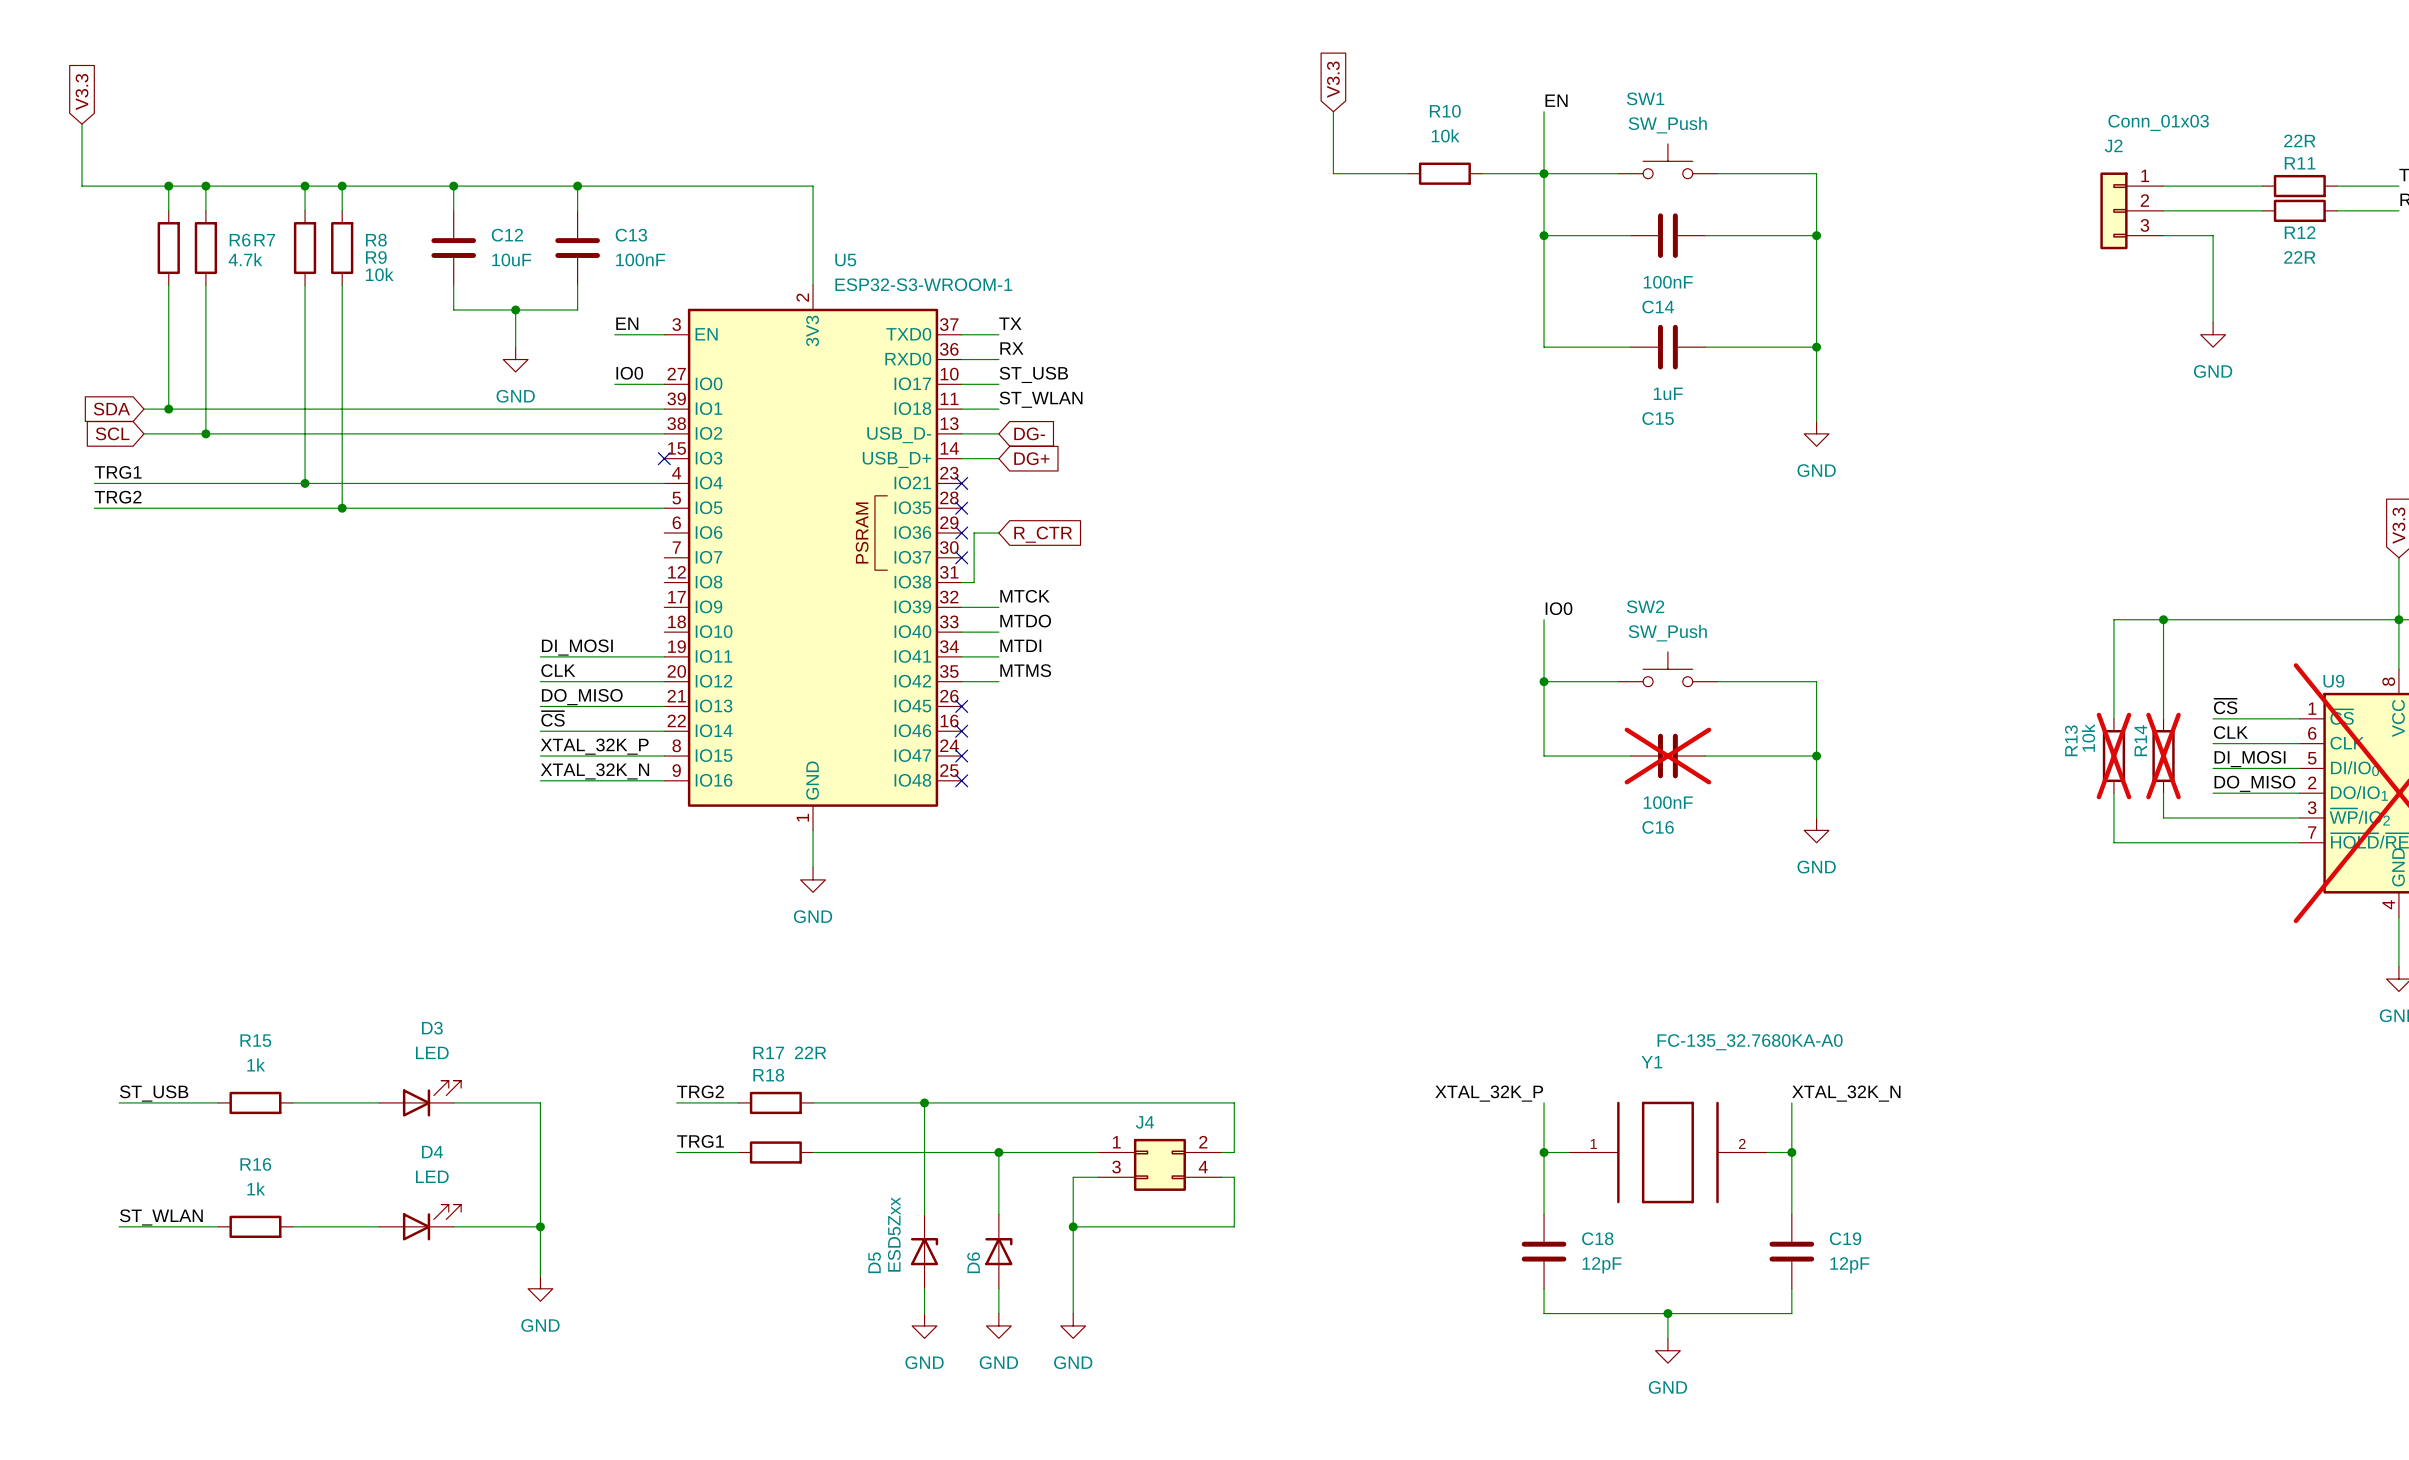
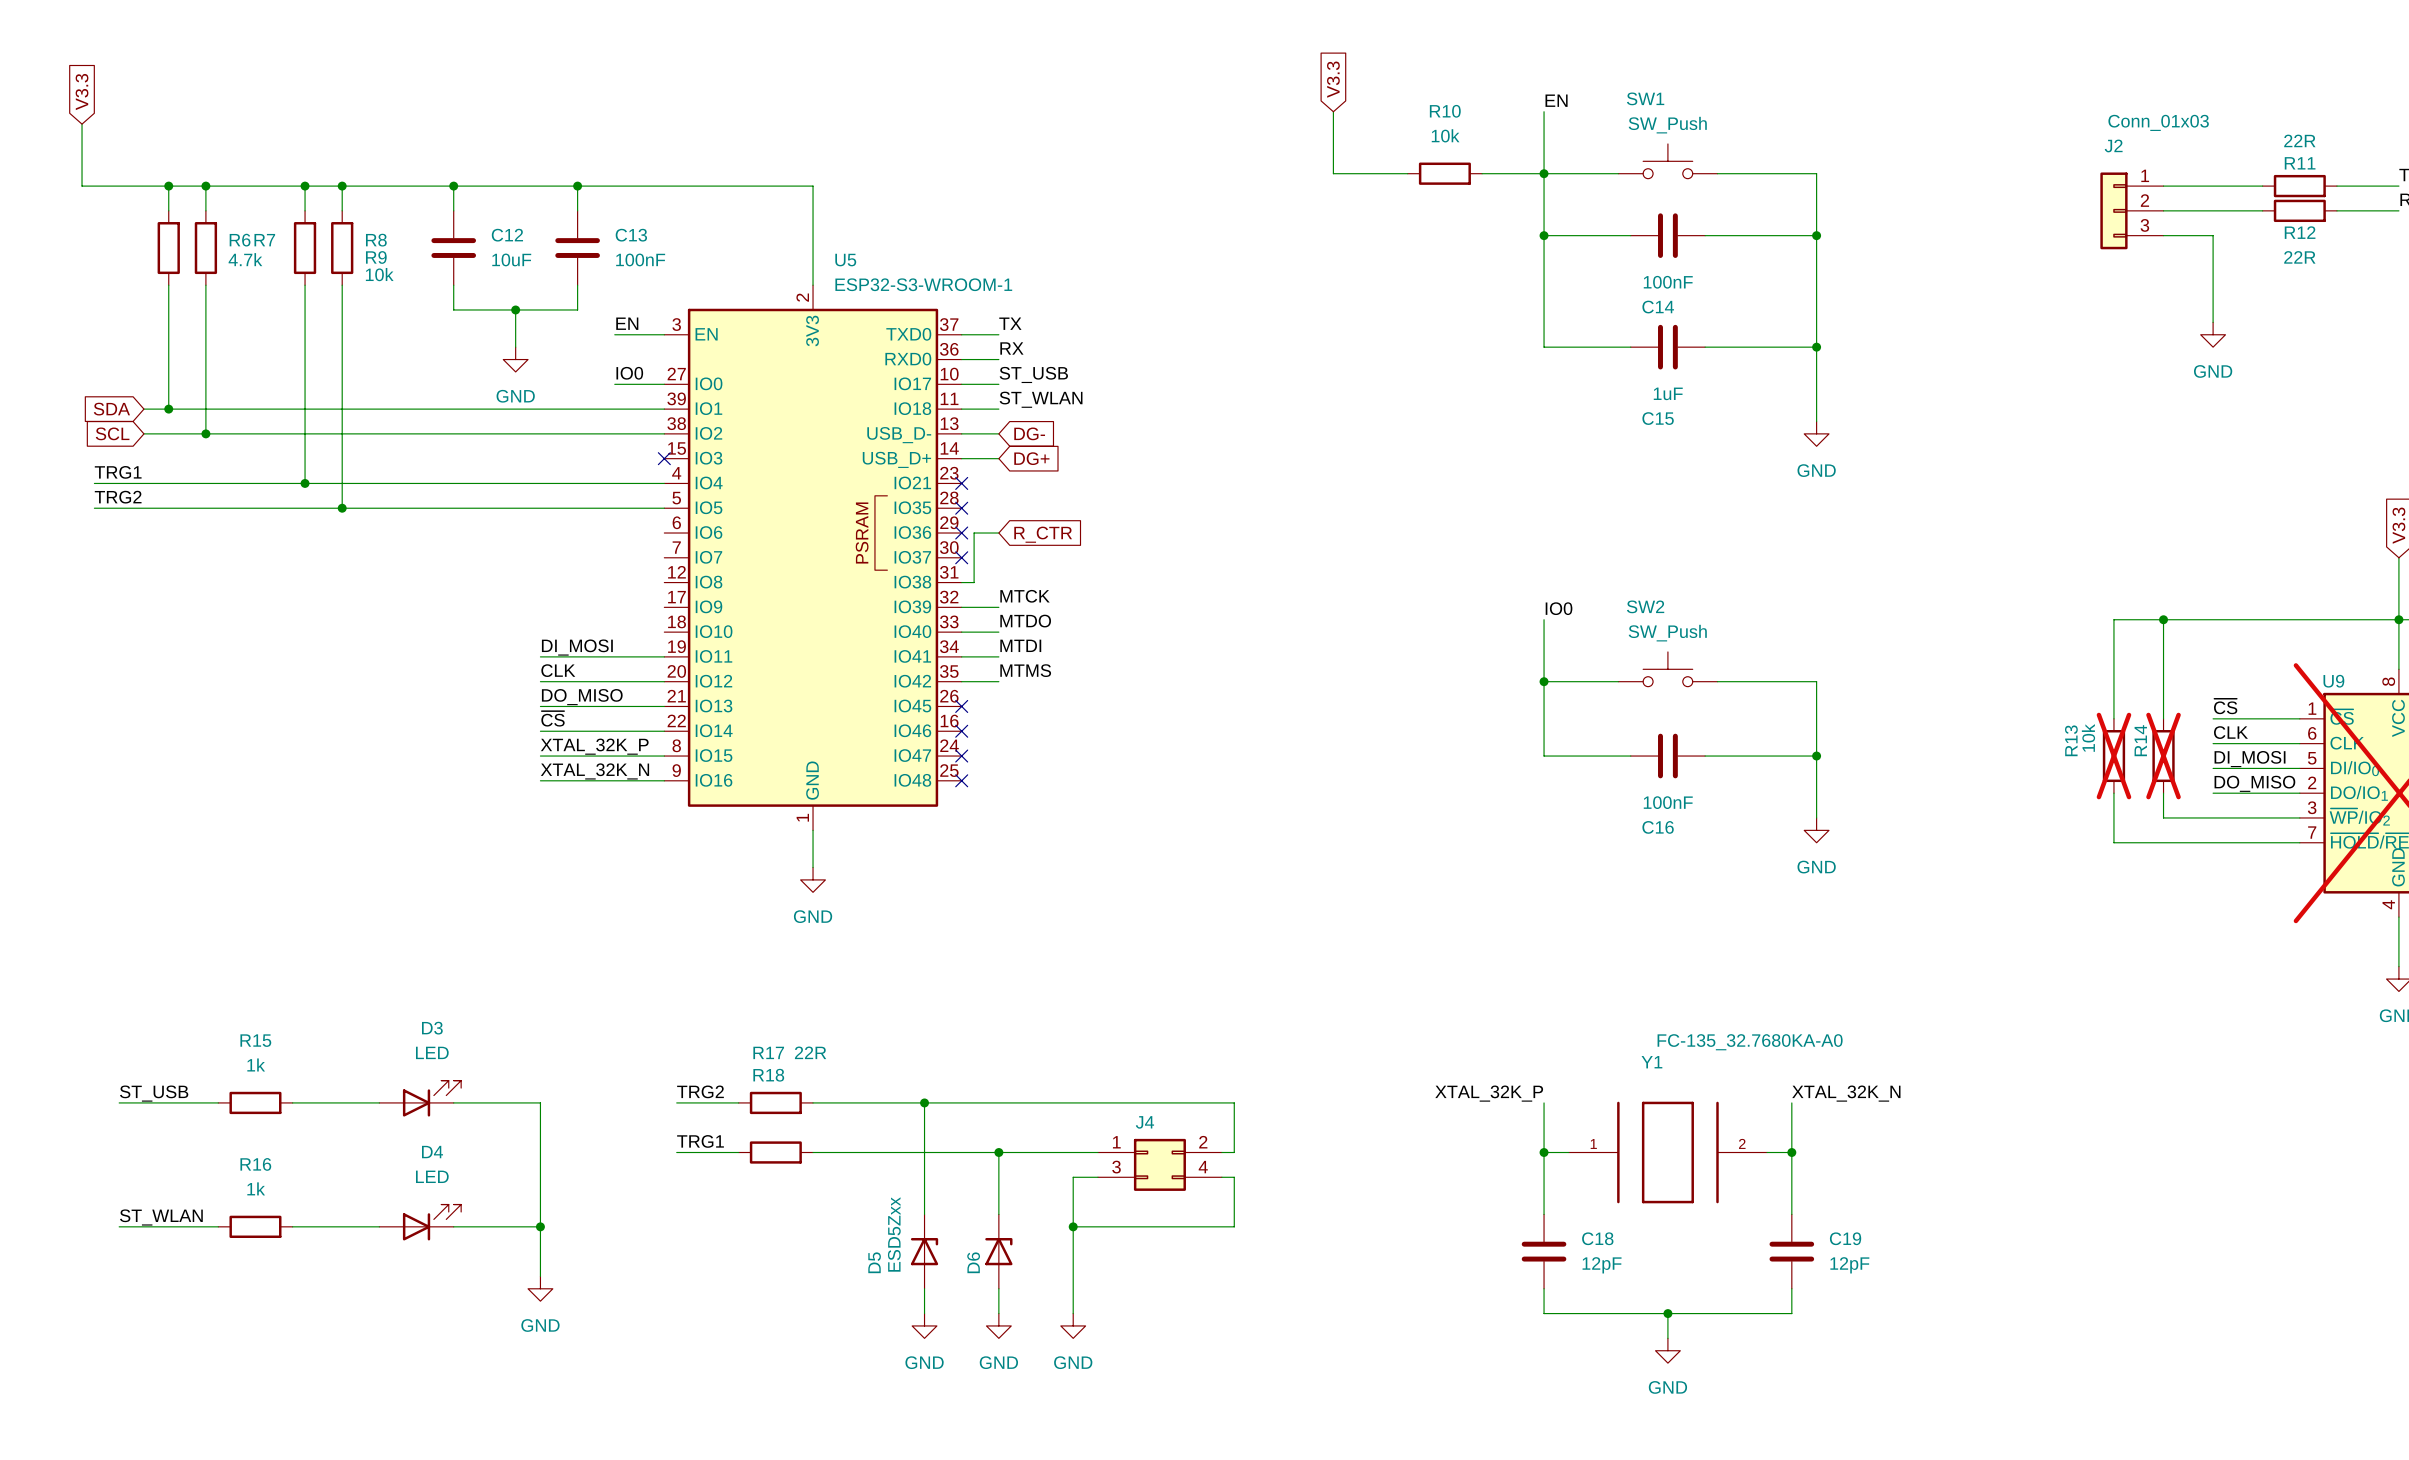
C16 do-not-place cross: (1667, 756) -> none

